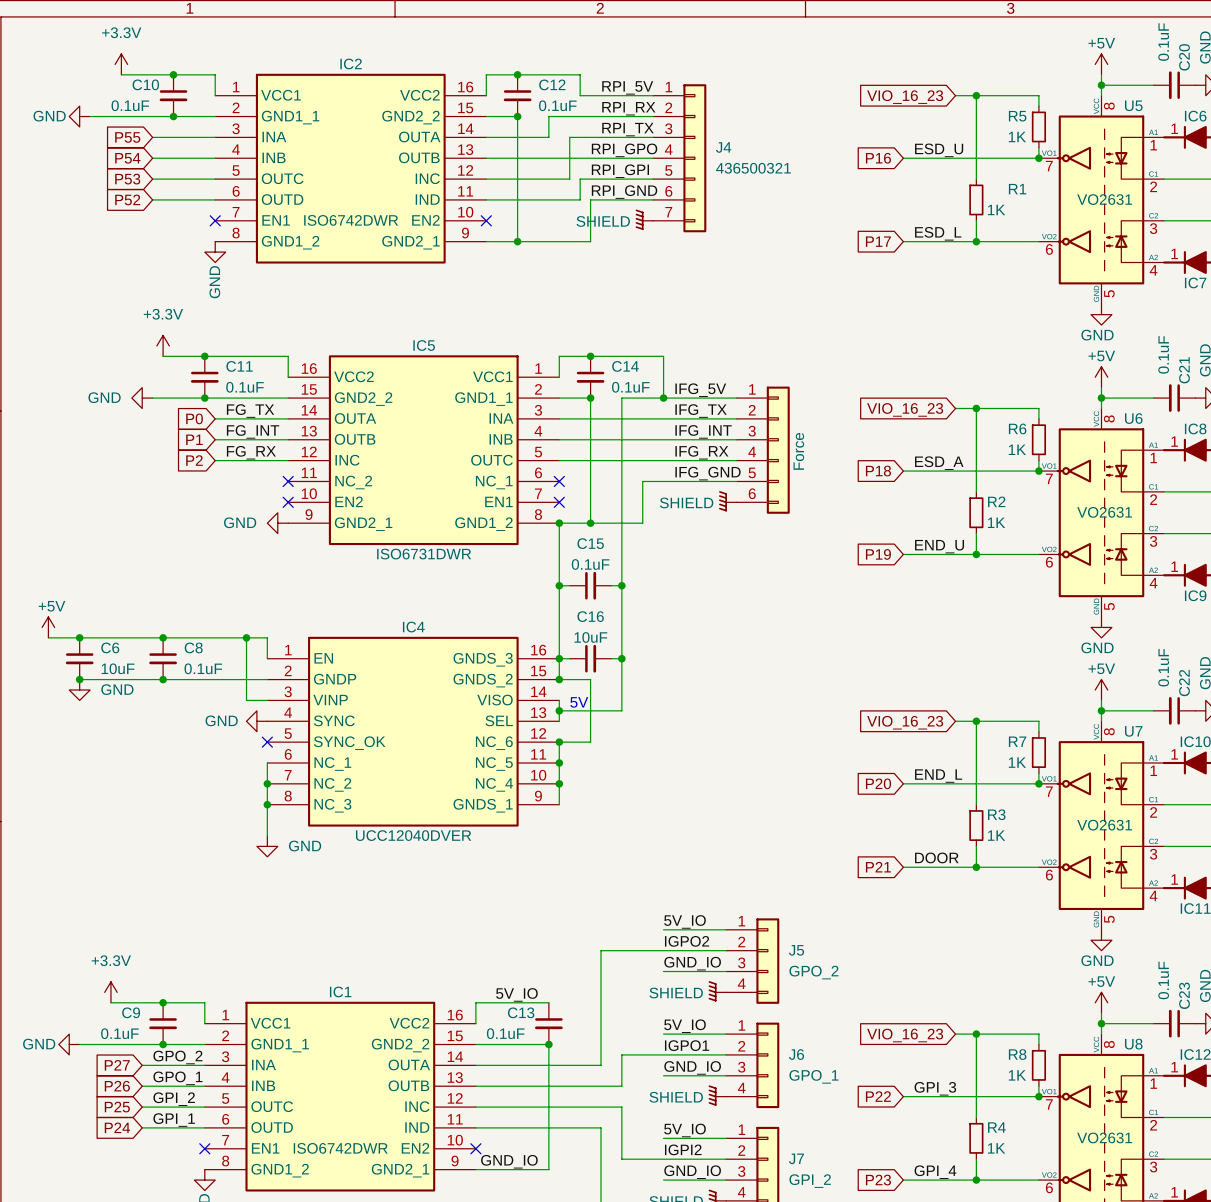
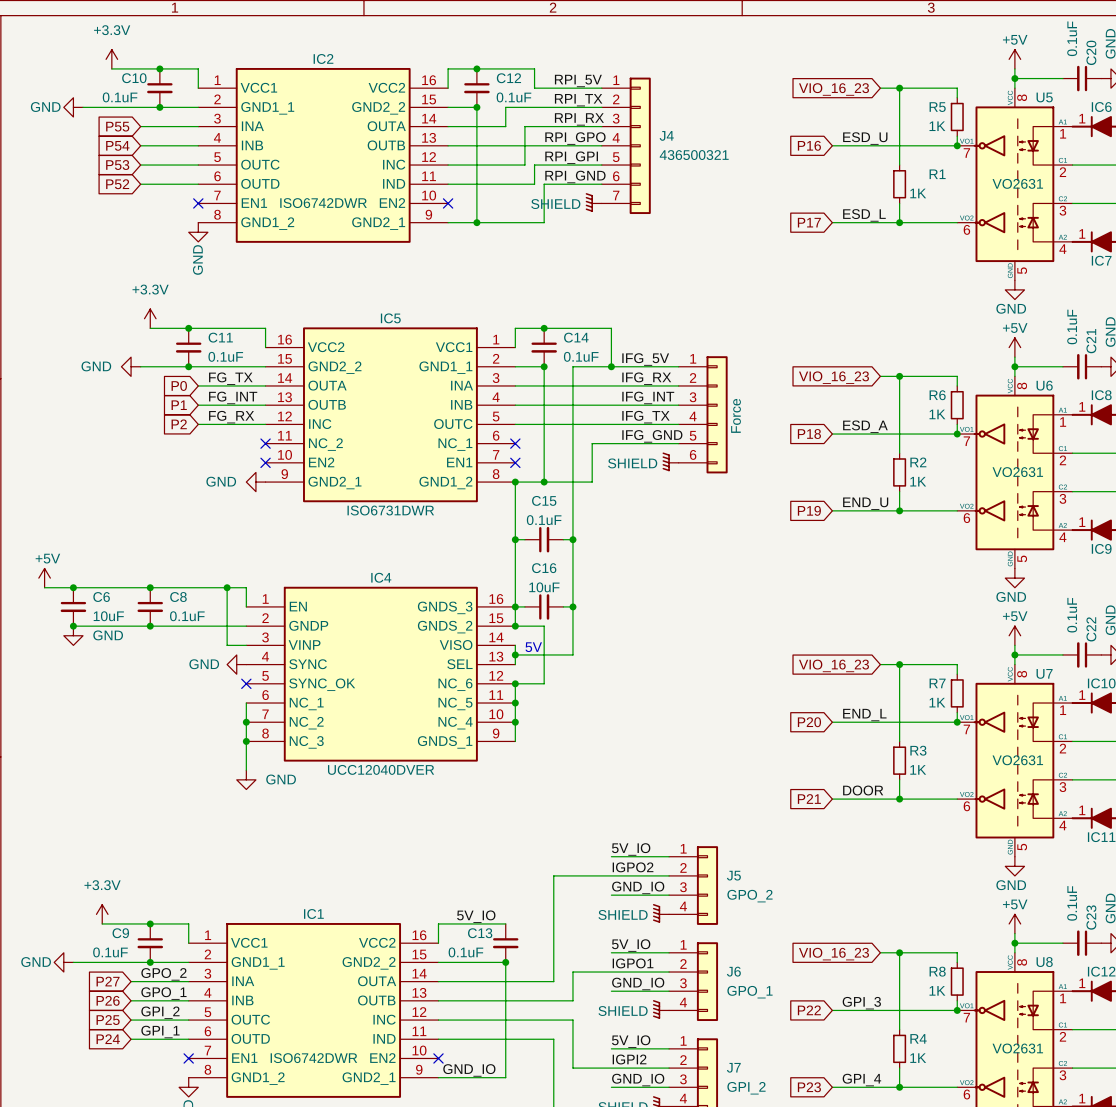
label: RPI_RX (628, 108) -> RPI_TX (578, 100)
label: RPI_TX (628, 129) -> RPI_RX (579, 119)
label: IFG_TX (701, 411) -> IFG_RX (646, 378)
label: IFG_RX (701, 452) -> IFG_TX (645, 417)

